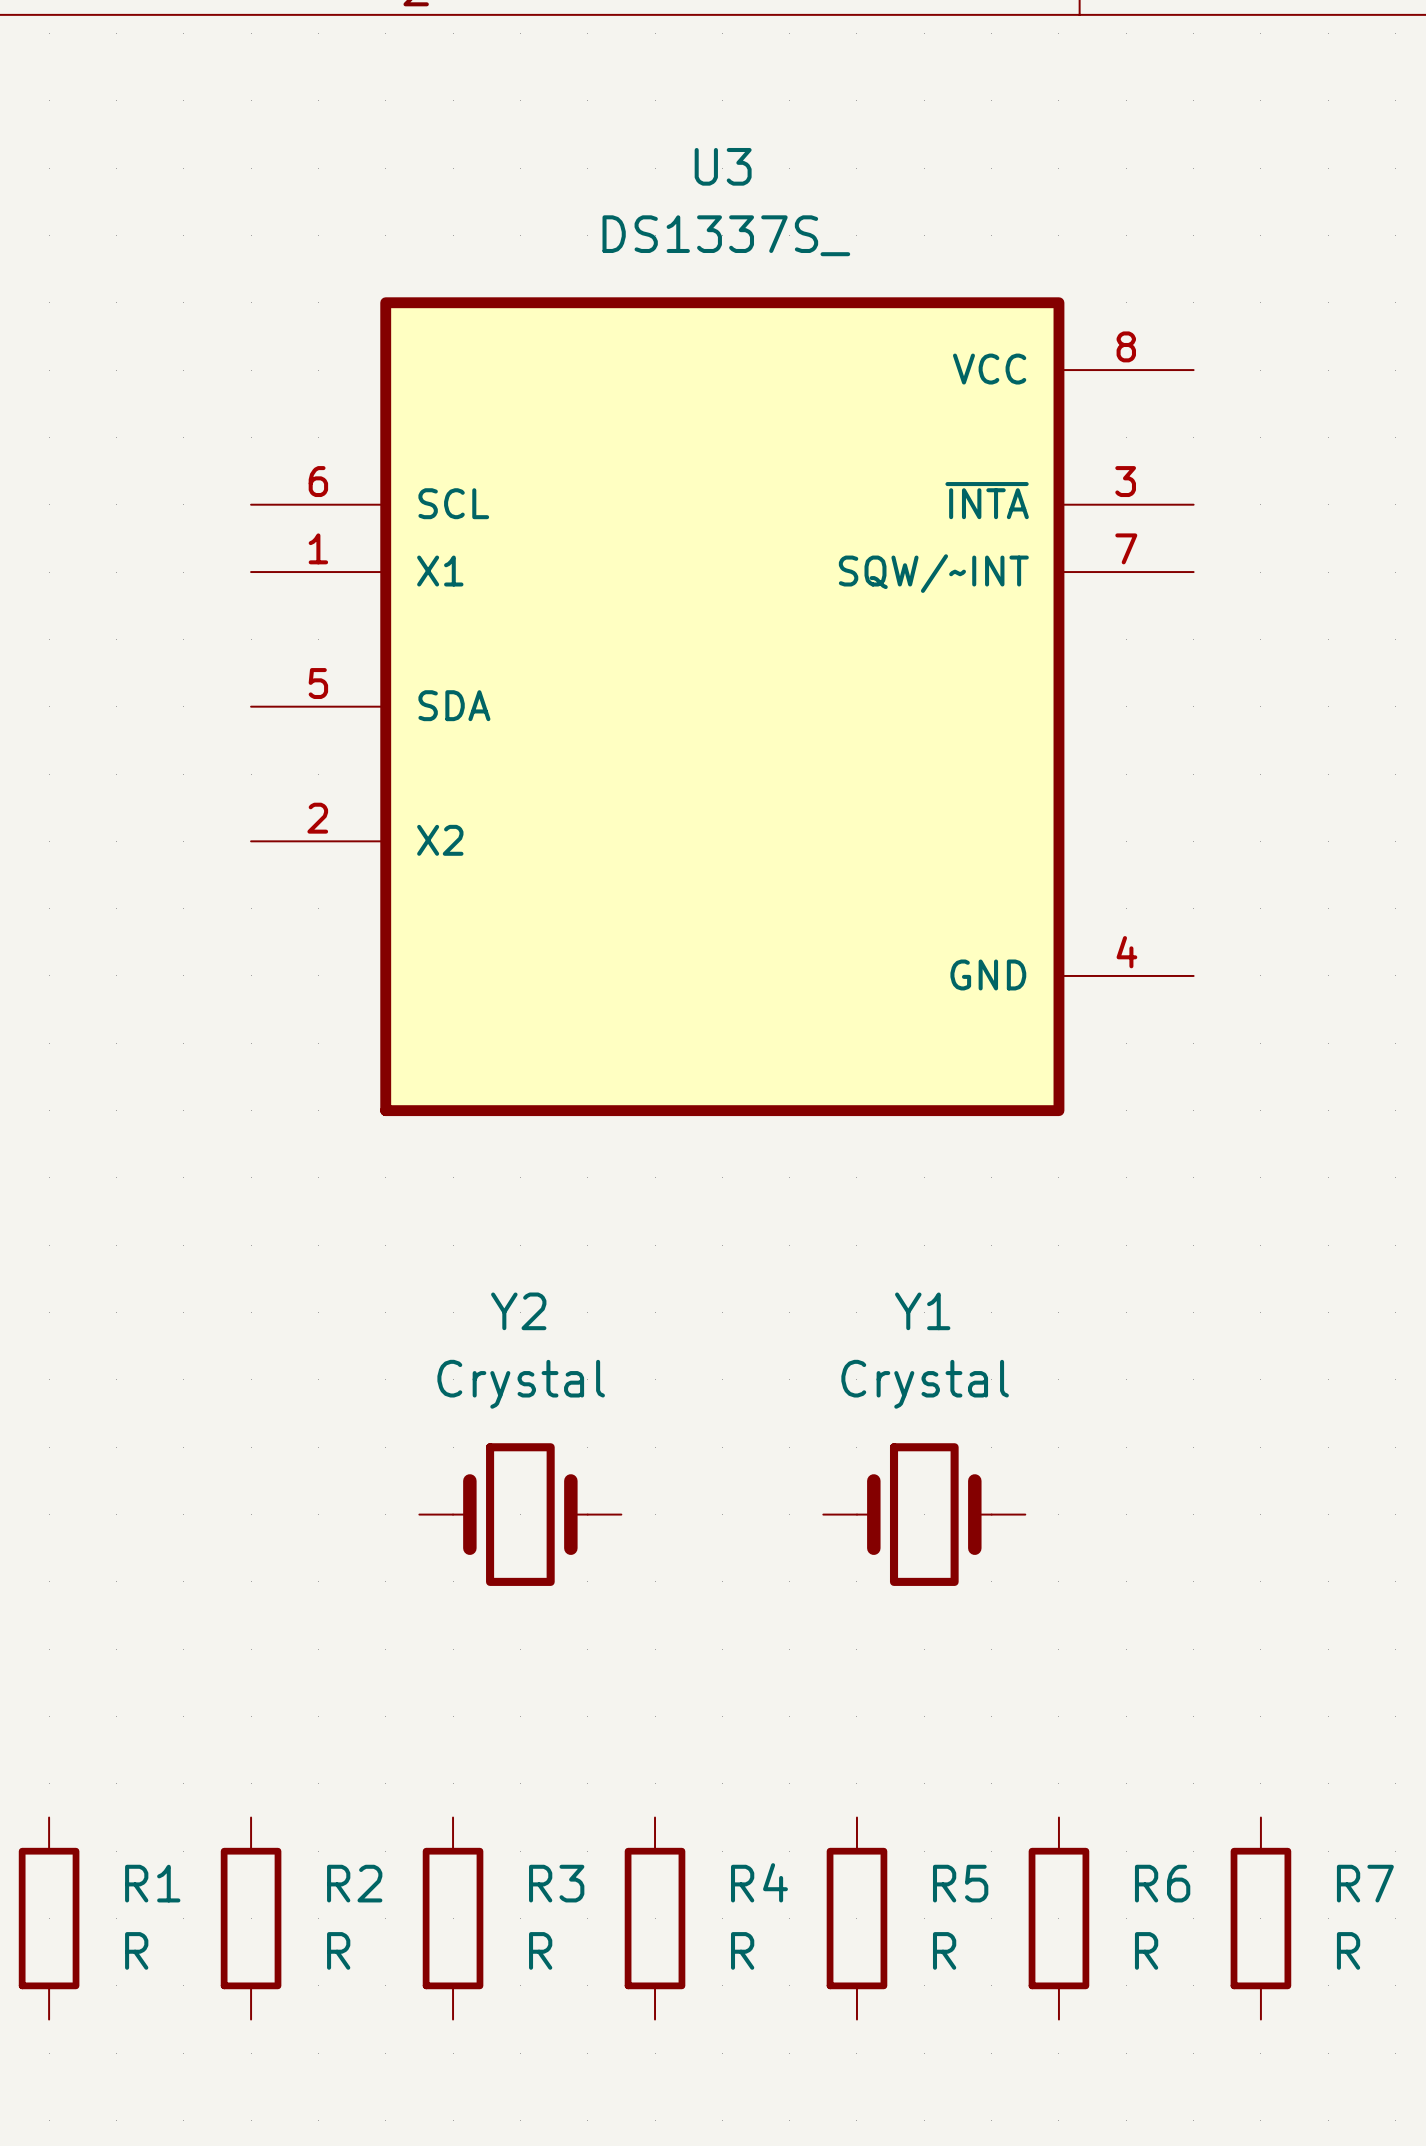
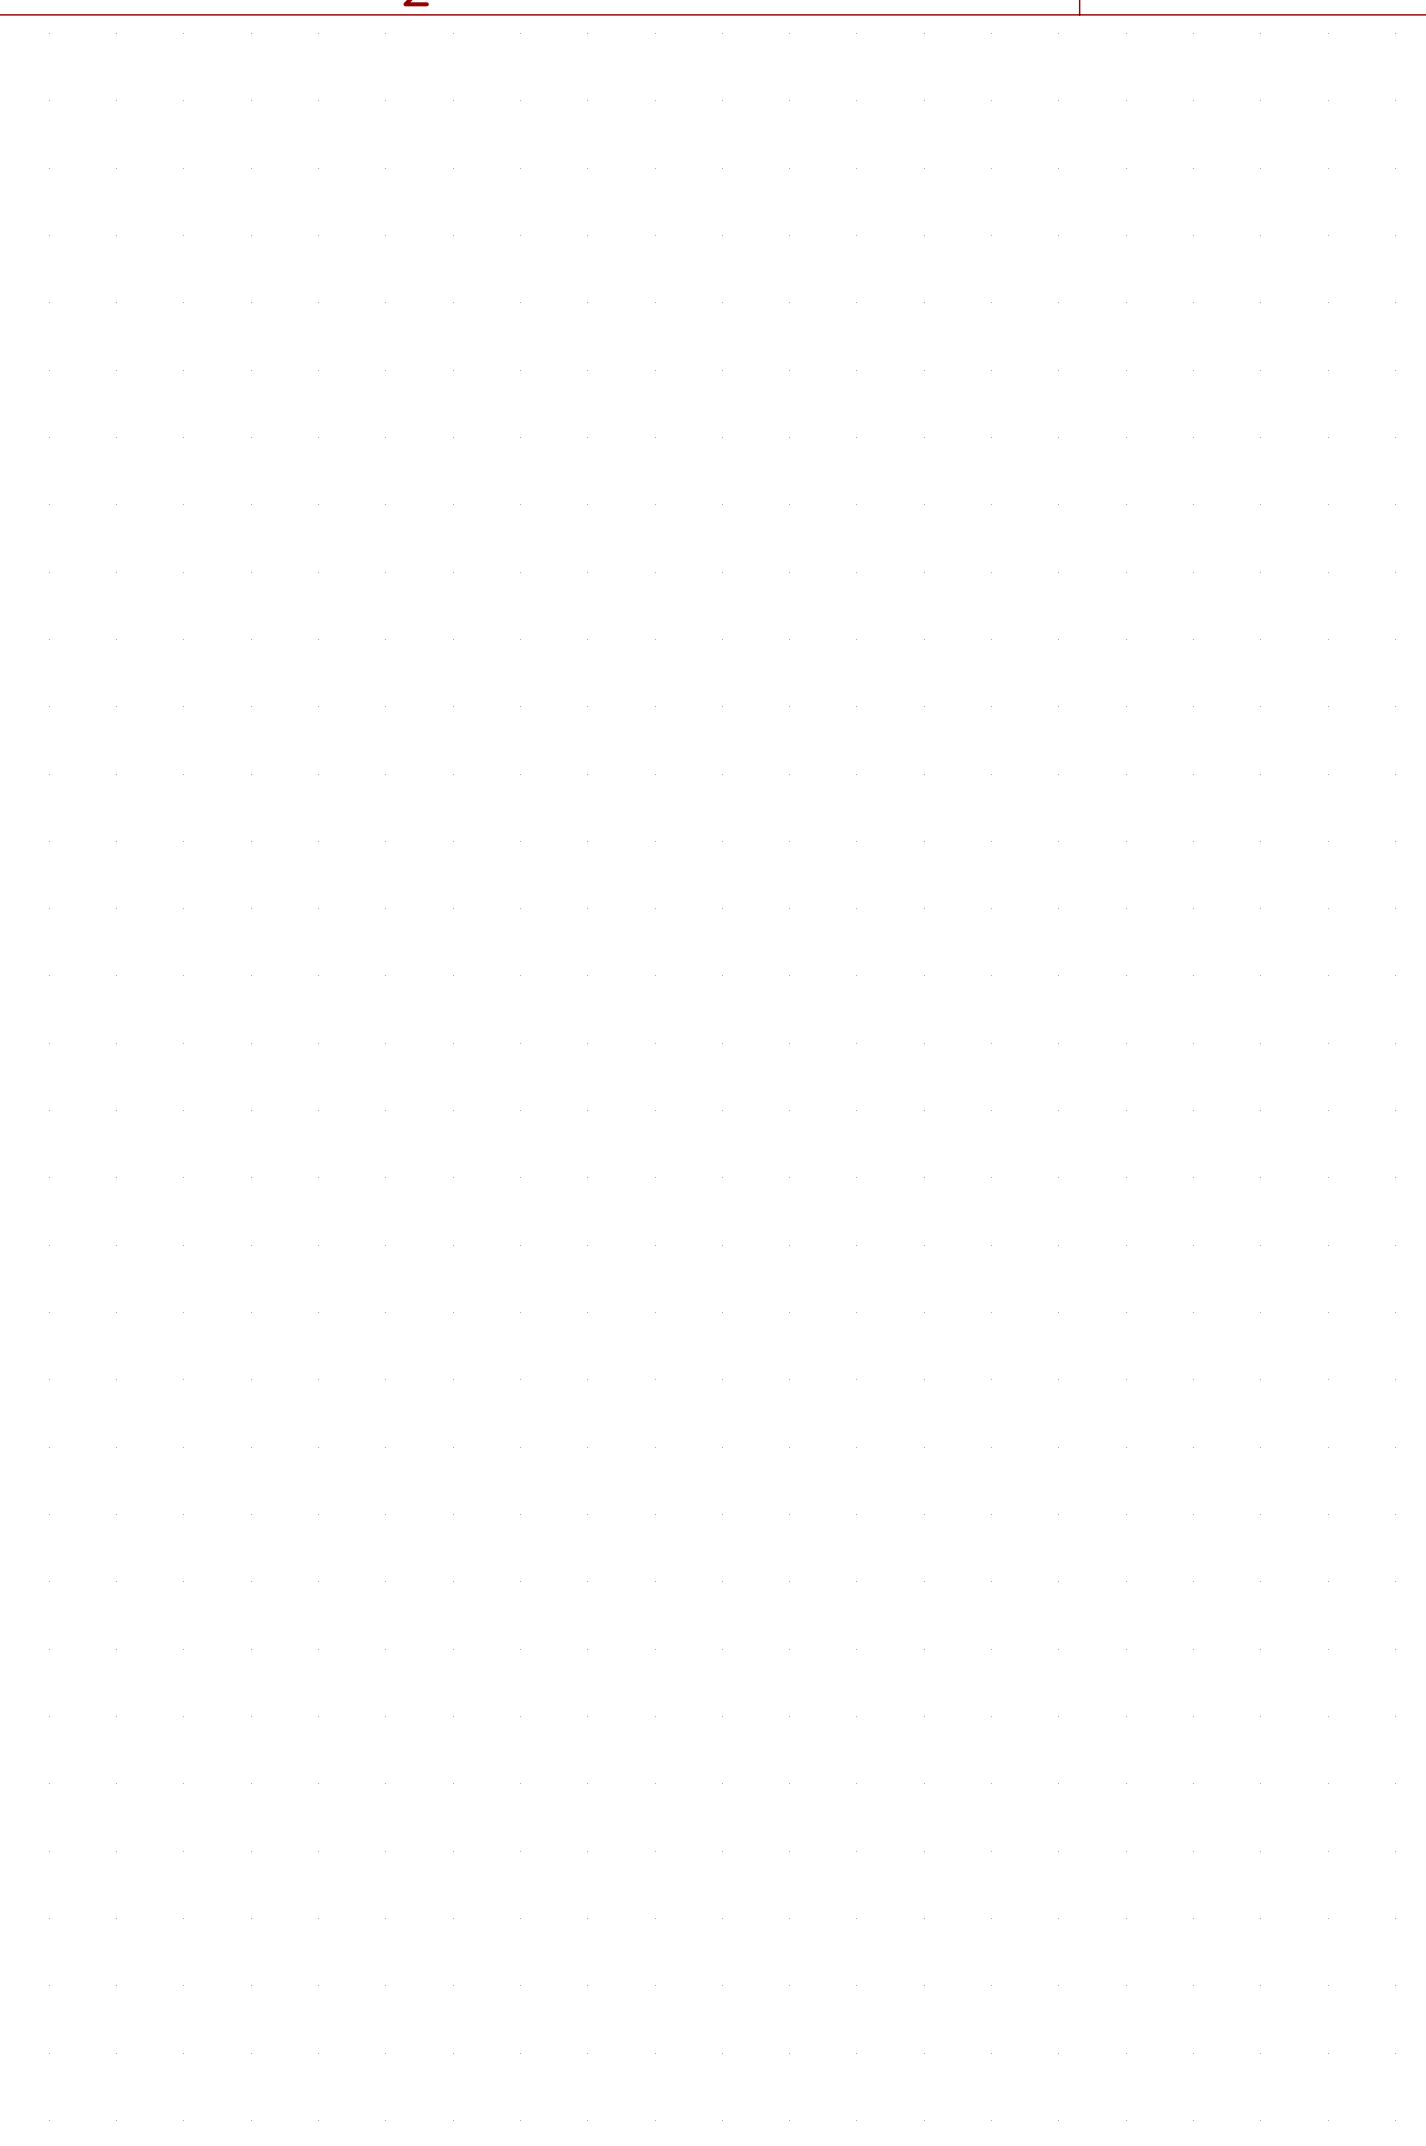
U3: DS1337S_ (722, 706) -> none
Y2: Crystal (520, 1514) -> none
Y1: Crystal (924, 1514) -> none
R1: R (49, 1918) -> none
R2: R (251, 1918) -> none
R3: R (453, 1918) -> none
R4: R (655, 1918) -> none
R5: R (856, 1918) -> none
R6: R (1058, 1918) -> none
R7: R (1260, 1918) -> none

